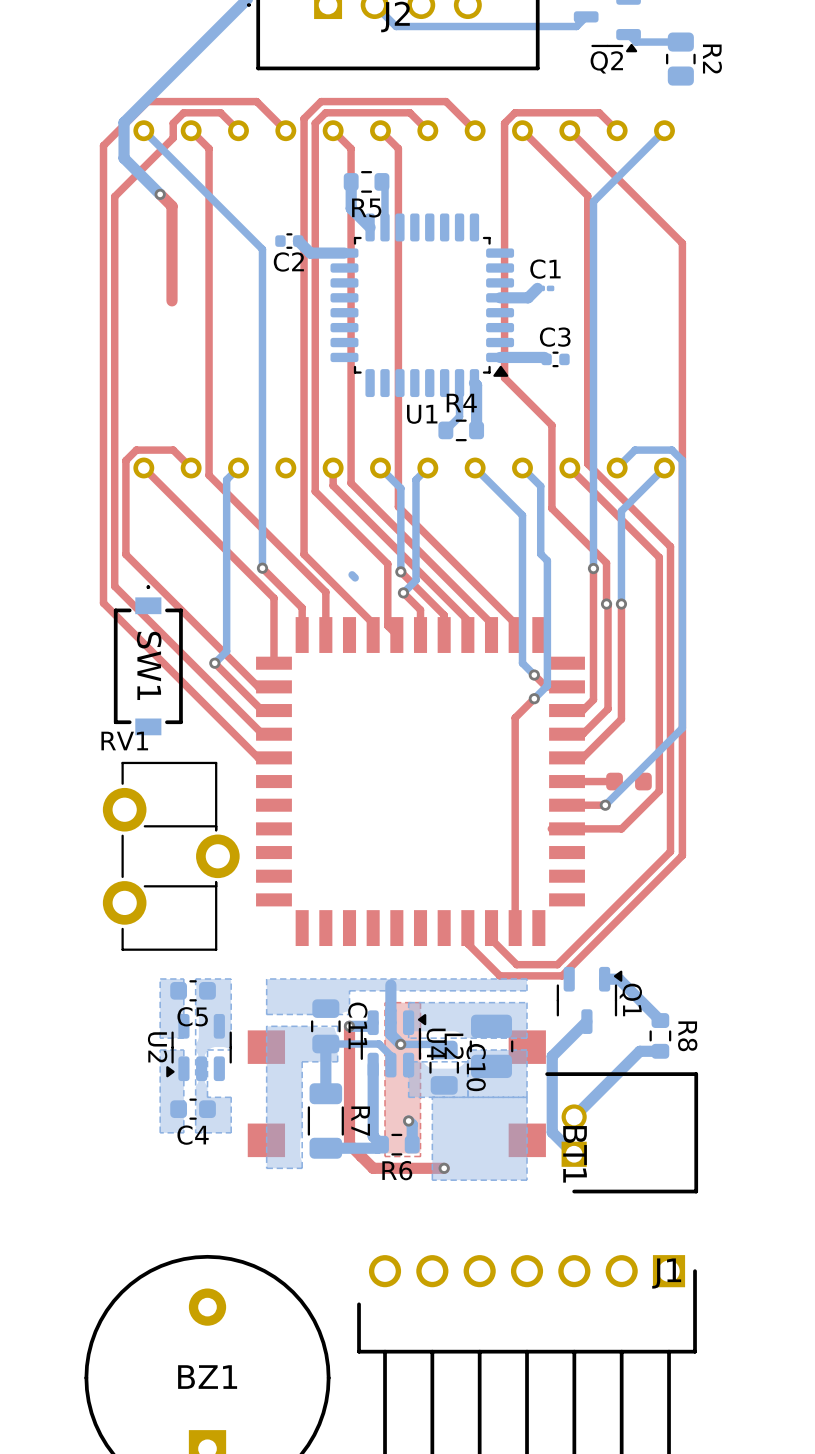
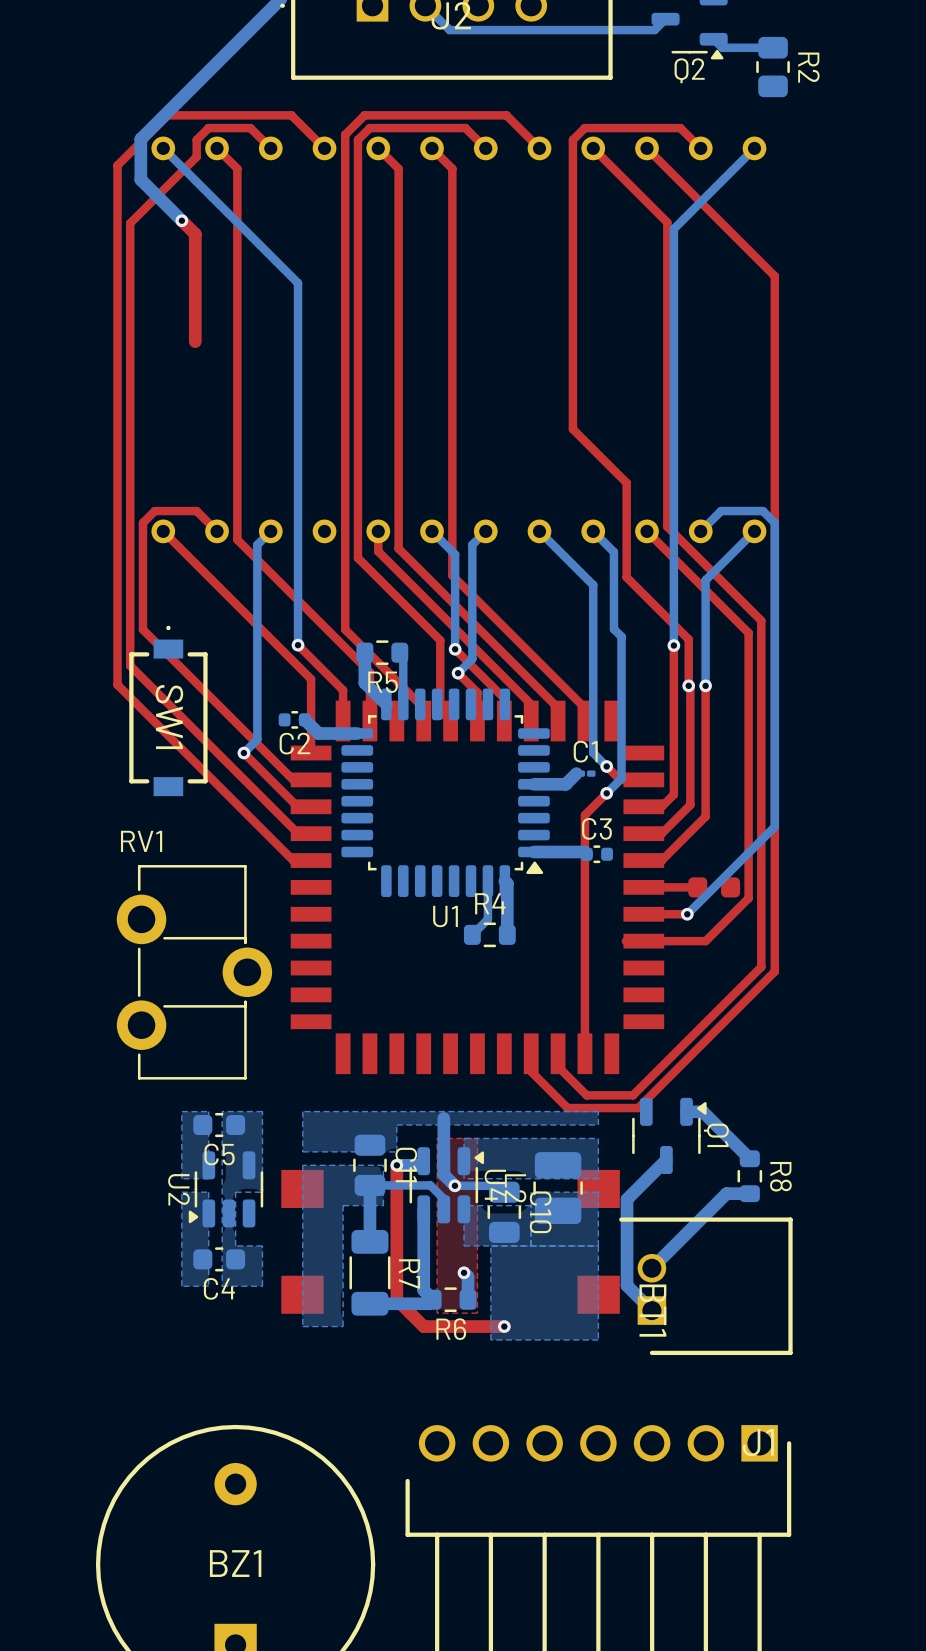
bottom track: (351, 181) (351, 208) (370, 227) -> (364, 652) (364, 682) (386, 704)
R5 position: (366, 181) -> (382, 652)
bottom track: (385, 184) (385, 227) -> (403, 656) (403, 704)
C2 position: (289, 241) -> (294, 719)
bottom track: (298, 241) (310, 253) (344, 253) -> (304, 719) (318, 733) (357, 733)
bottom track: (537, 288) (528, 297) (500, 297) -> (576, 773) (565, 784) (533, 784)
C1 position: (545, 288) -> (586, 773)
U1 position: (422, 305) -> (445, 792)
bottom track: (544, 357) (500, 357) -> none
C3 position: (555, 359) -> (596, 854)
bottom track: (459, 383) (459, 416) (445, 430) -> (487, 881) (487, 919) (472, 934)
bottom track: (474, 383) (476, 385) (476, 430) -> (504, 881) (507, 883) (507, 934)
R4 position: (461, 430) -> (489, 934)
SW1 position: (148, 660) -> (168, 710)
bottom track: none -> (533, 852) (584, 852) (586, 854)

